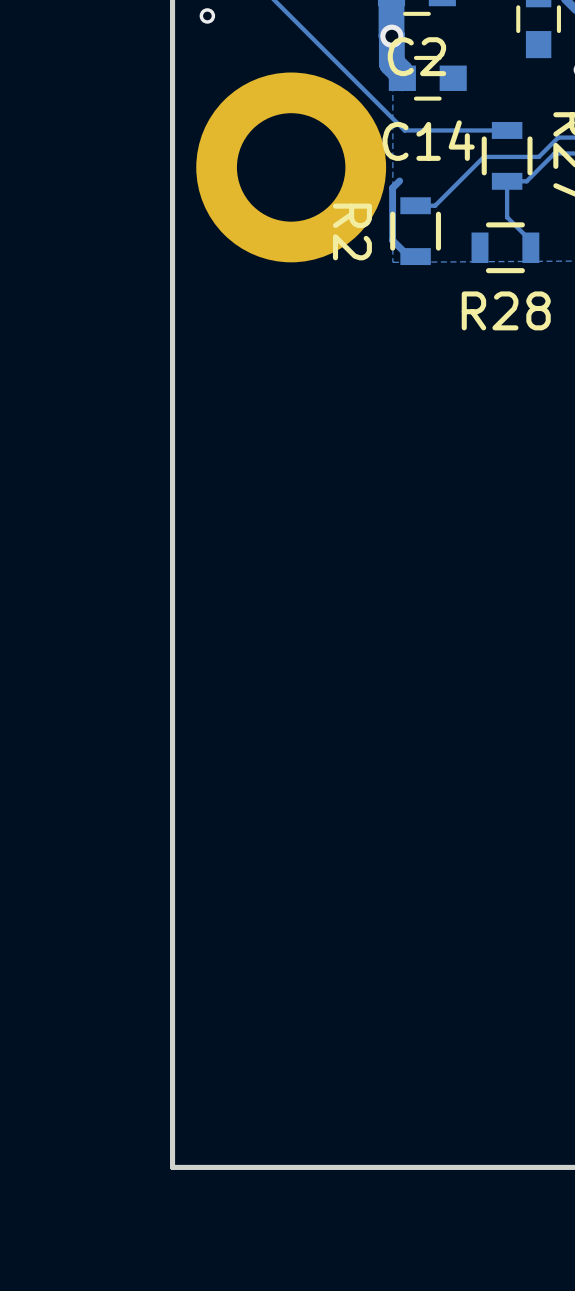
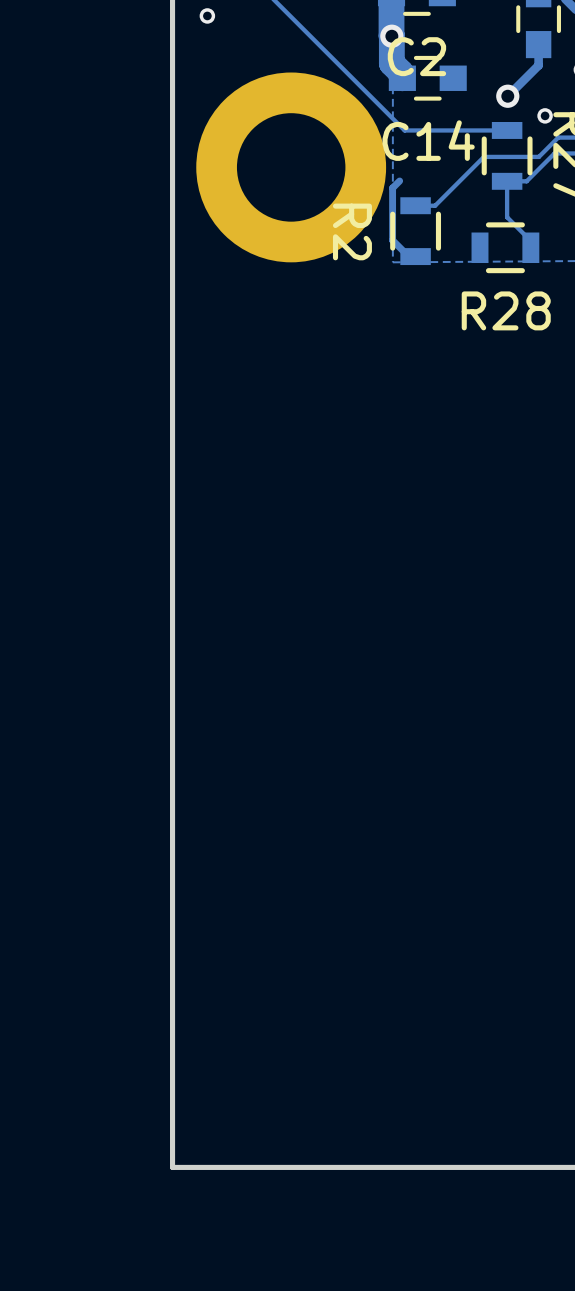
track: none -> (538, 44) (538, 65) (507, 96)
via: none -> (507, 96)
via: none -> (545, 115)

